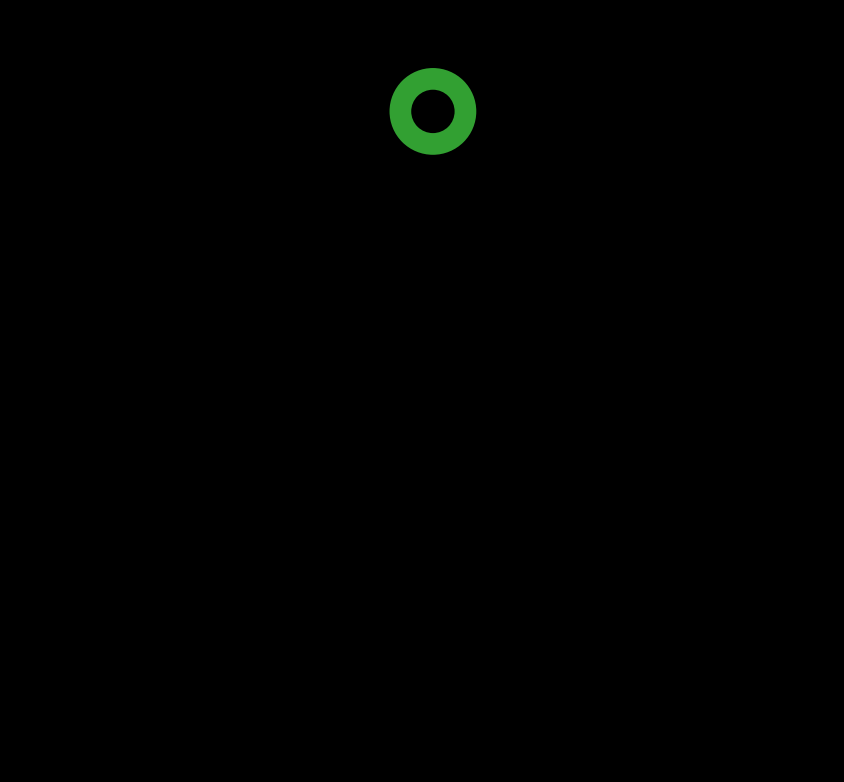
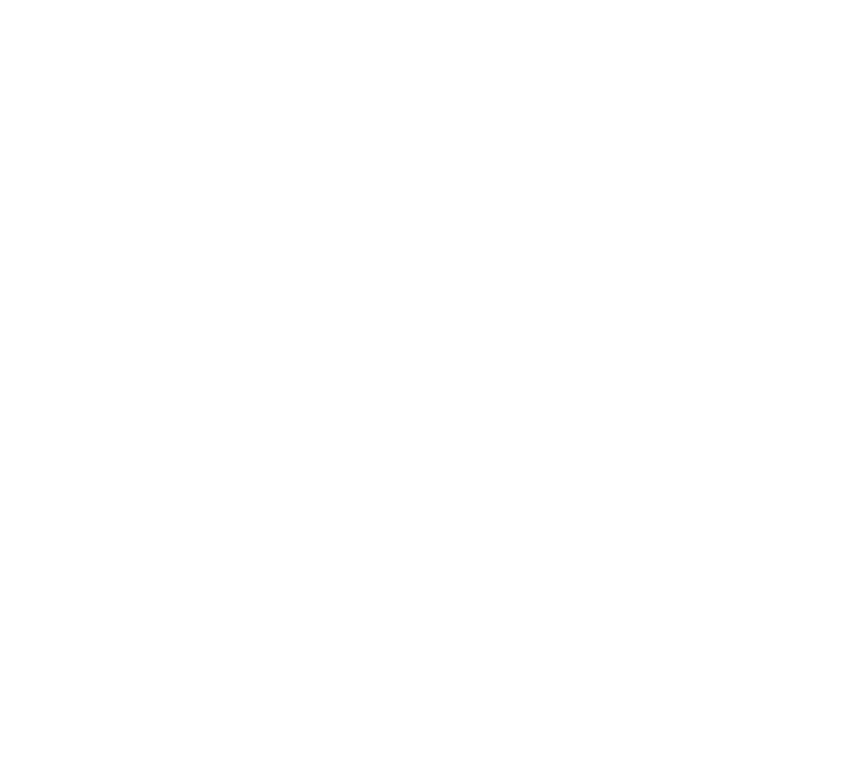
via: (432, 111) -> none

